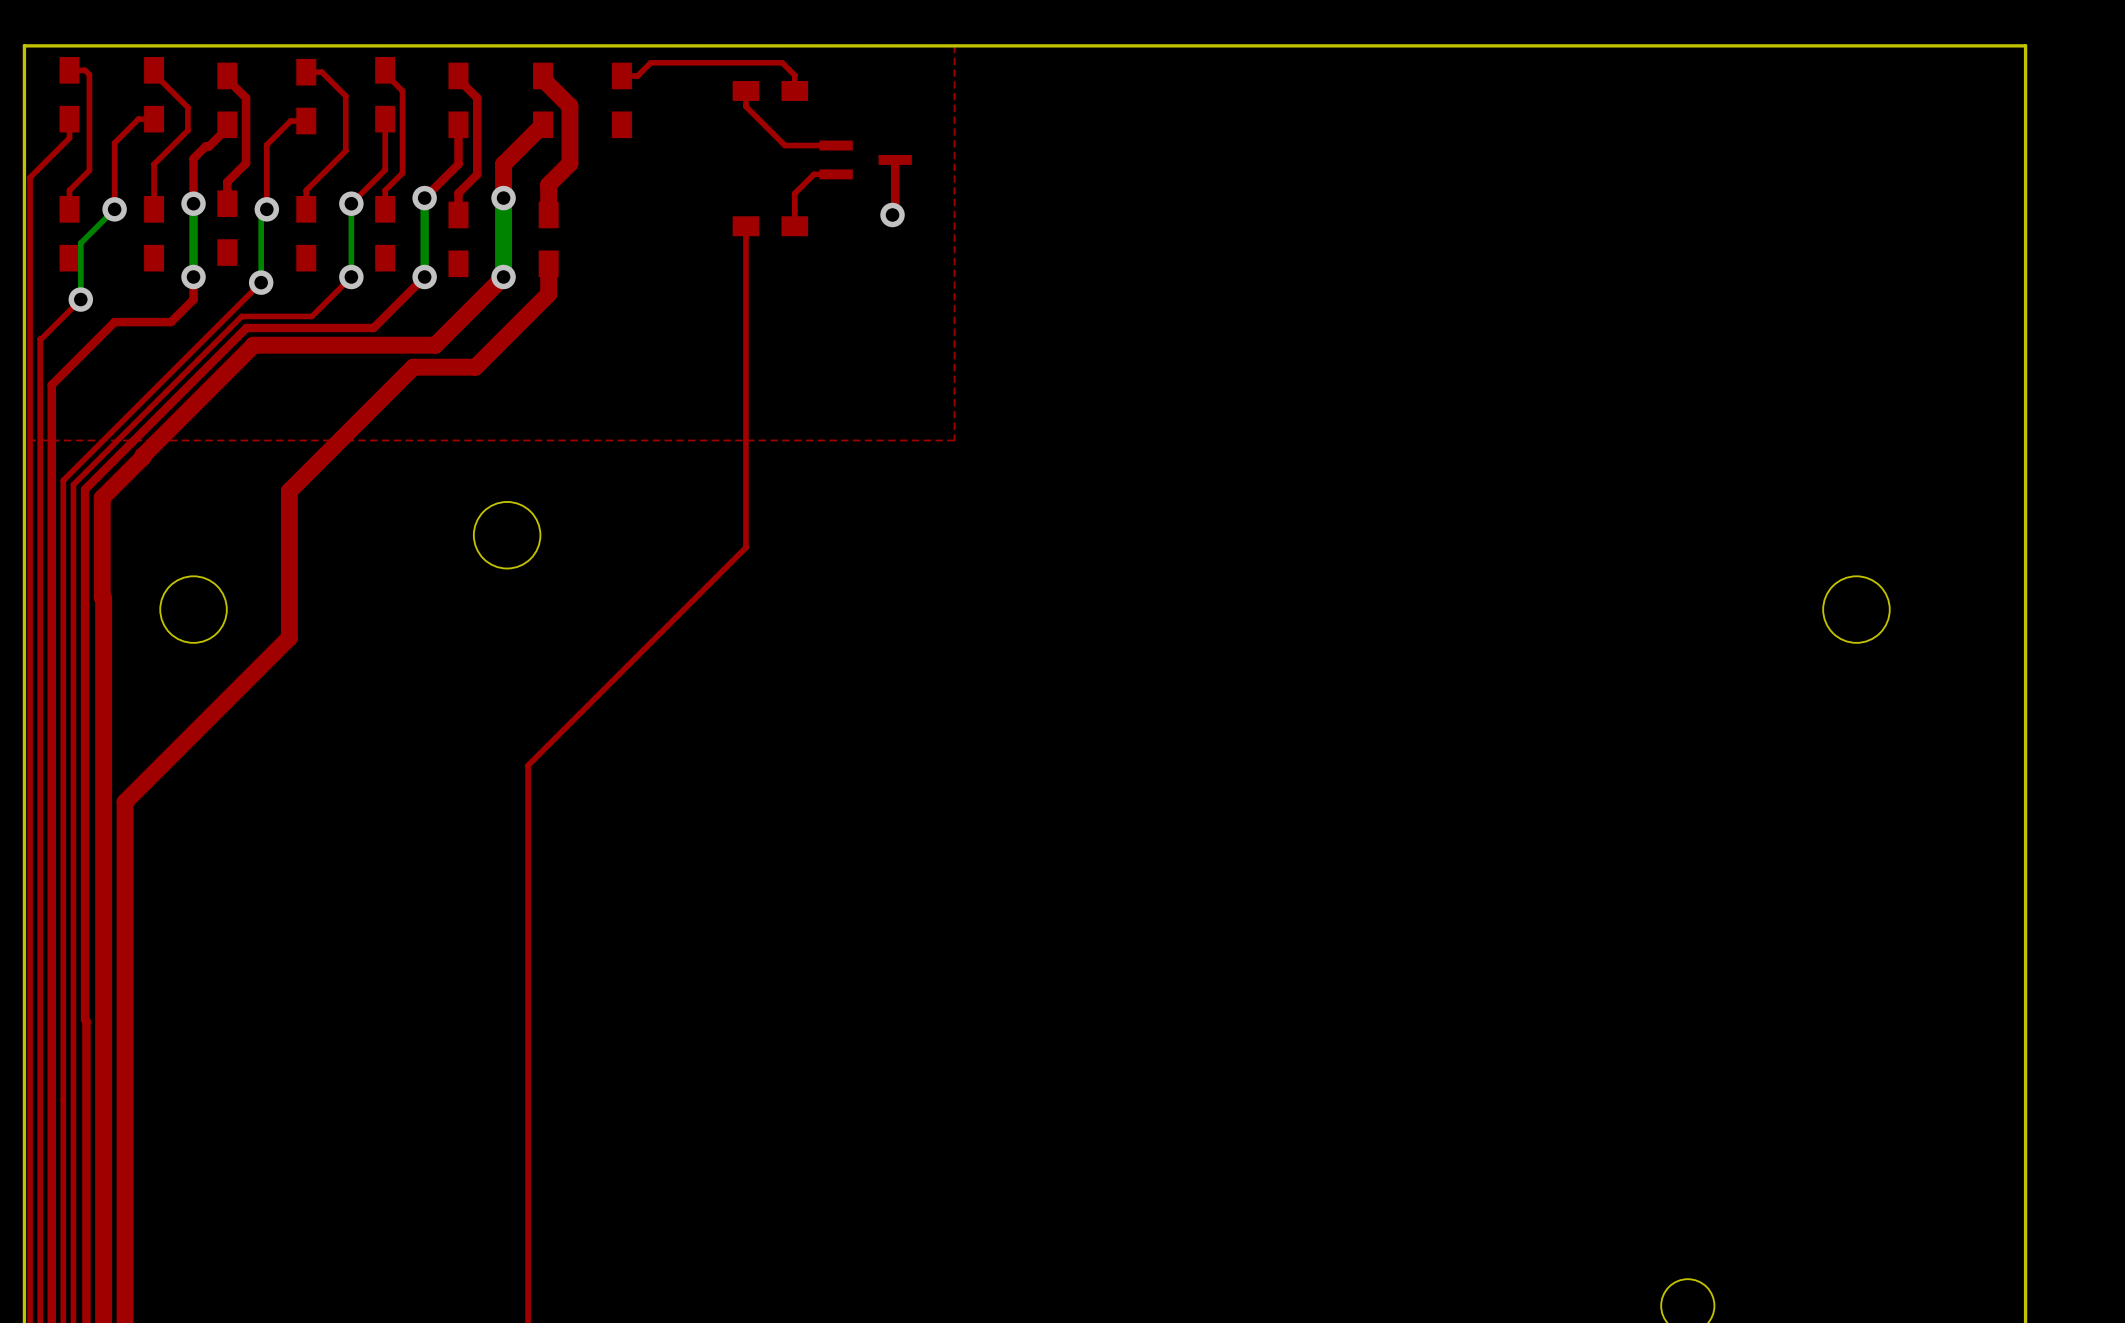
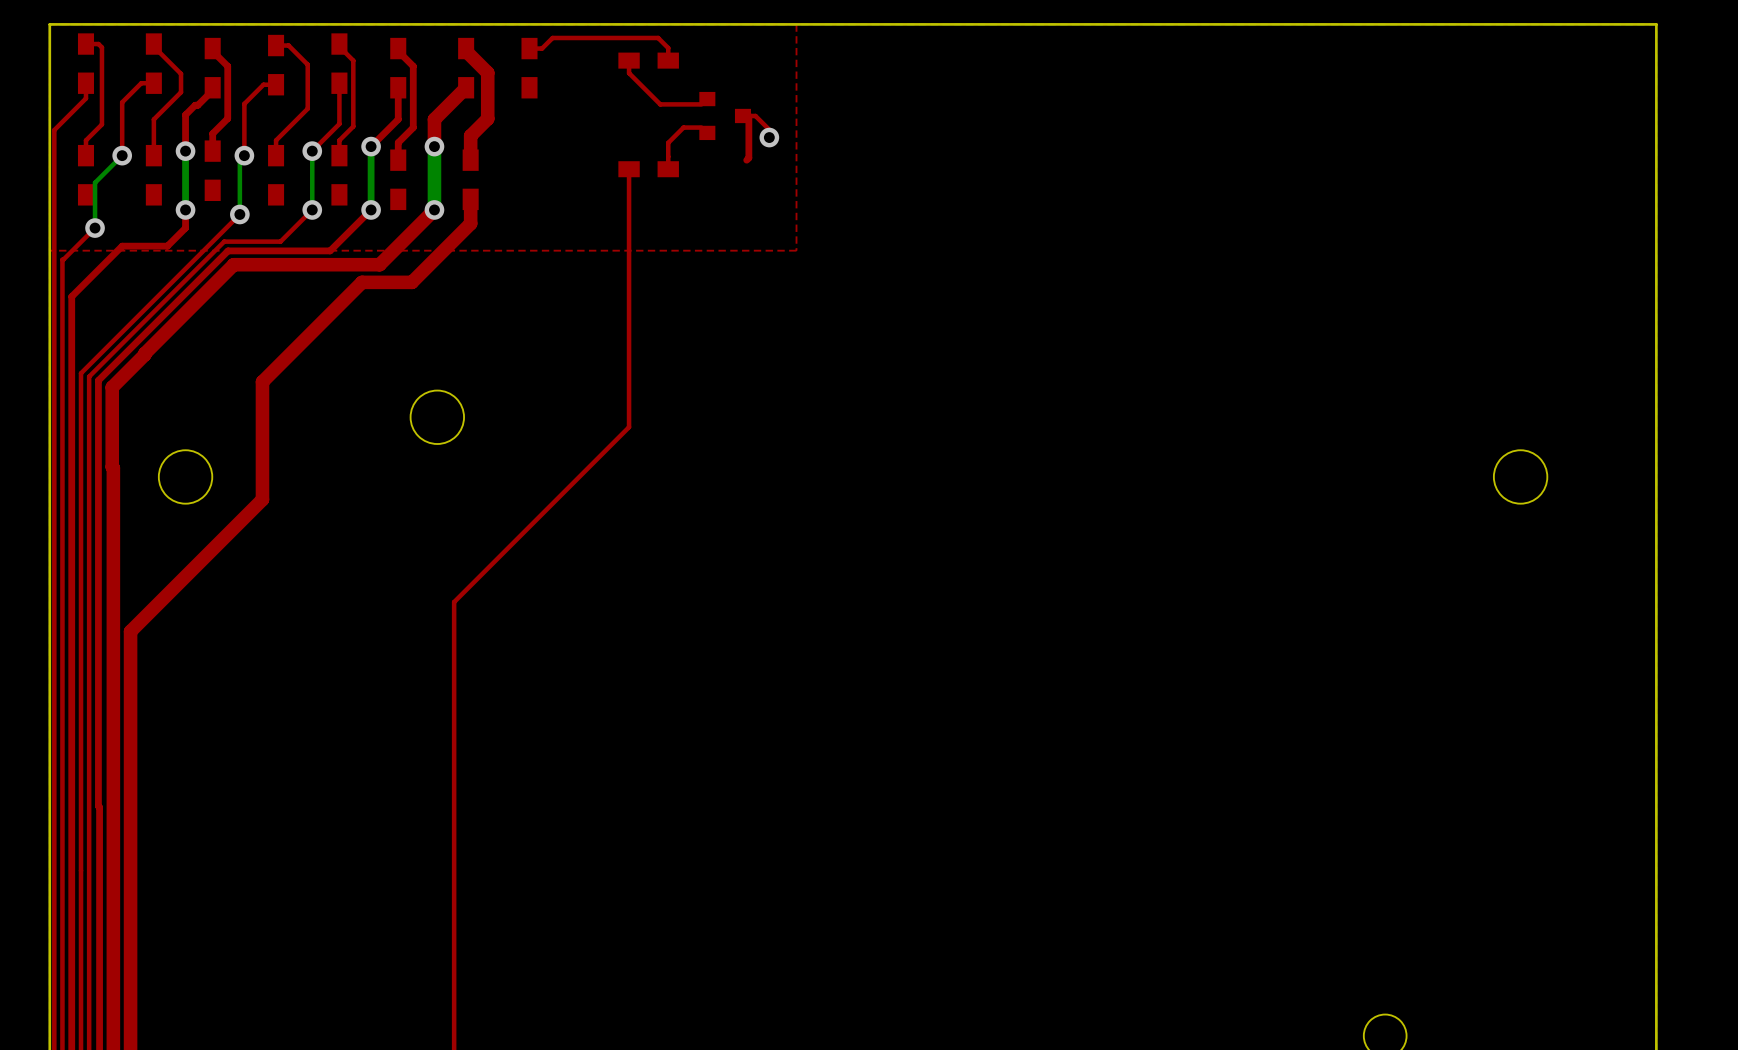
part footprint: [819, 140, 912, 180] -> [699, 91, 752, 141]
top track: none -> (742, 115) (755, 115) (769, 129) (769, 137)
via position: (892, 214) -> (769, 137)
top zone outline: (954, 327) (954, 440) (24, 440) (24, 327) -> (796, 250) (49, 250)

